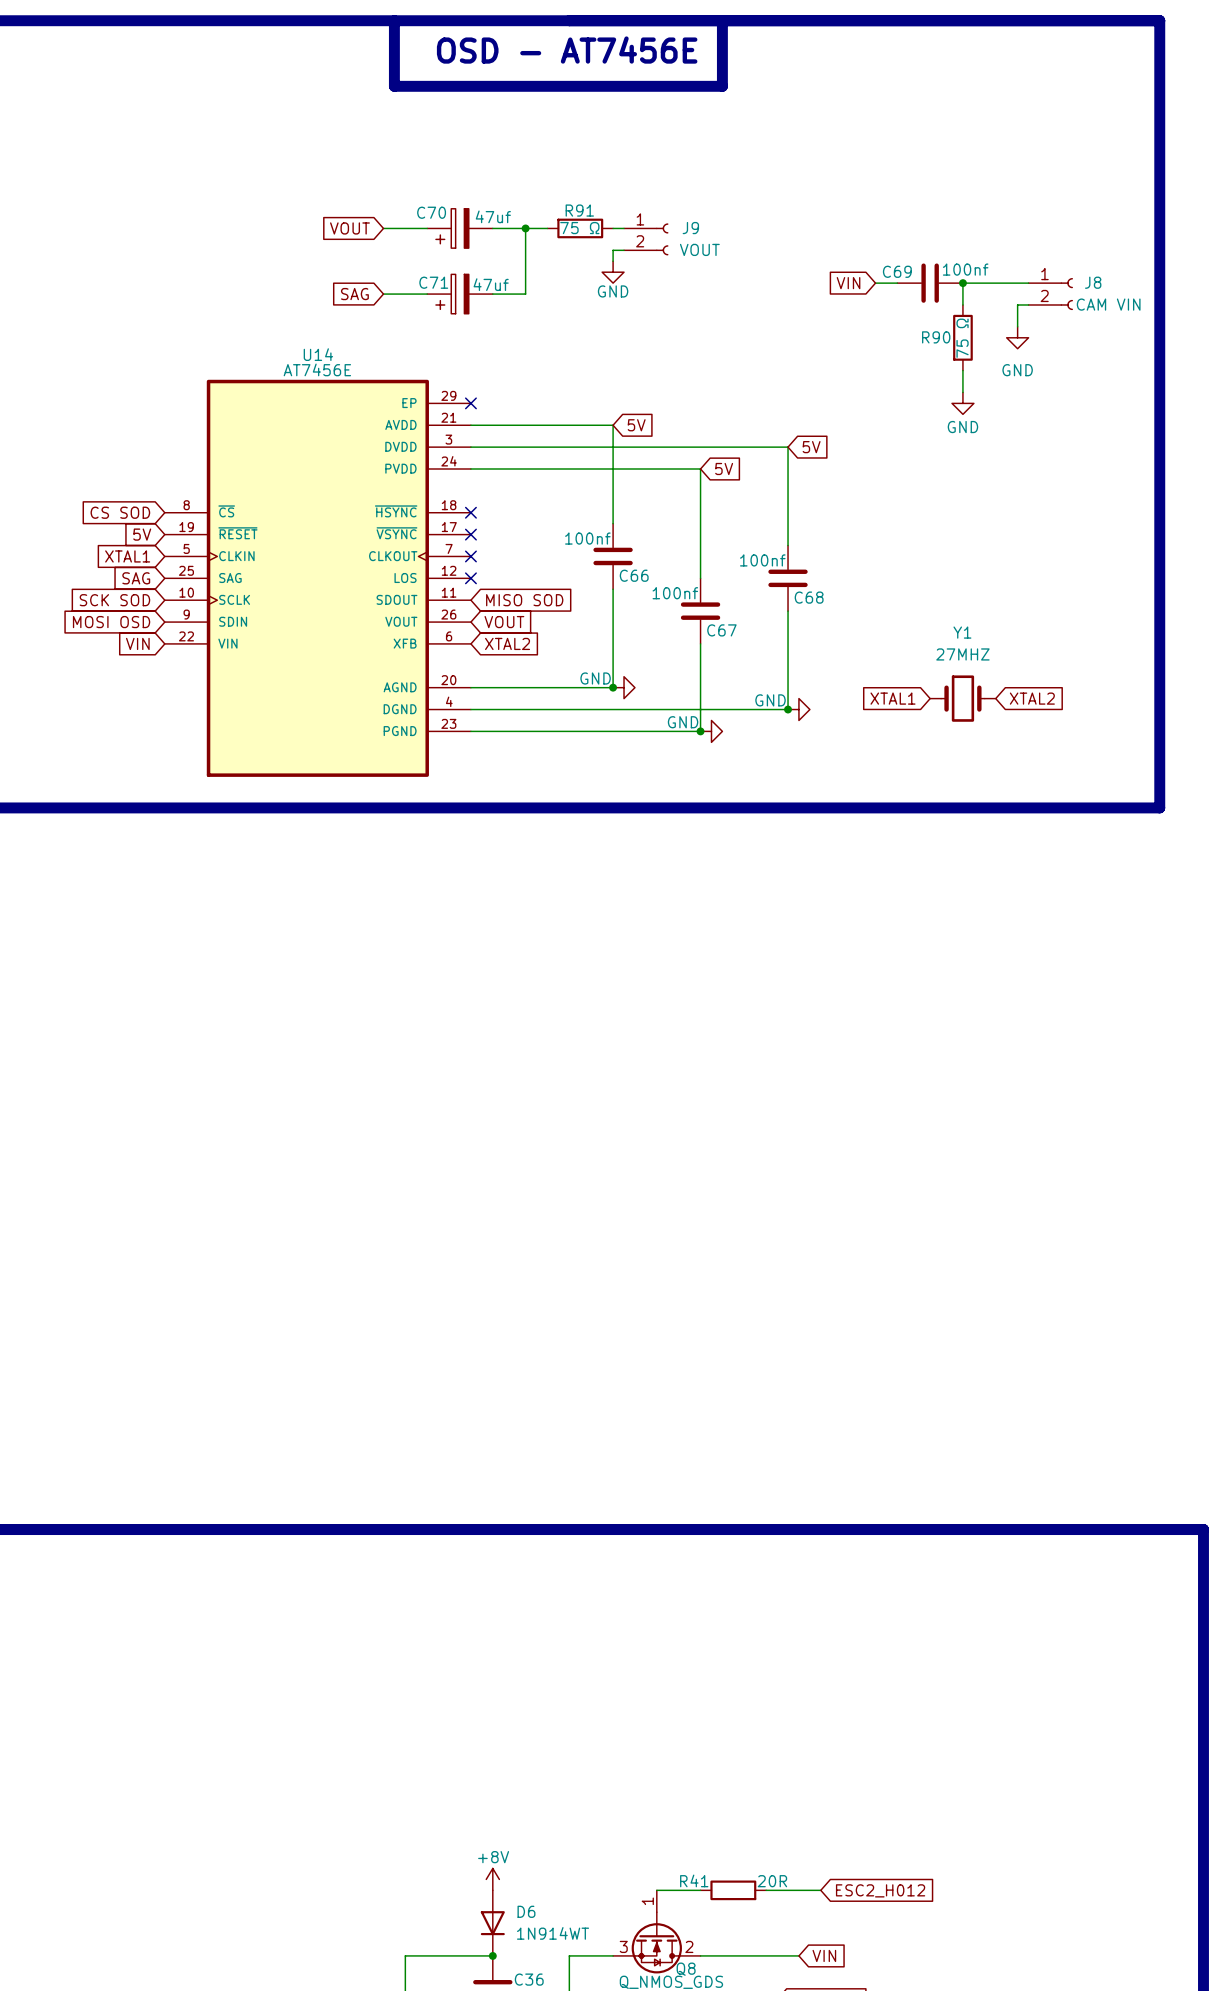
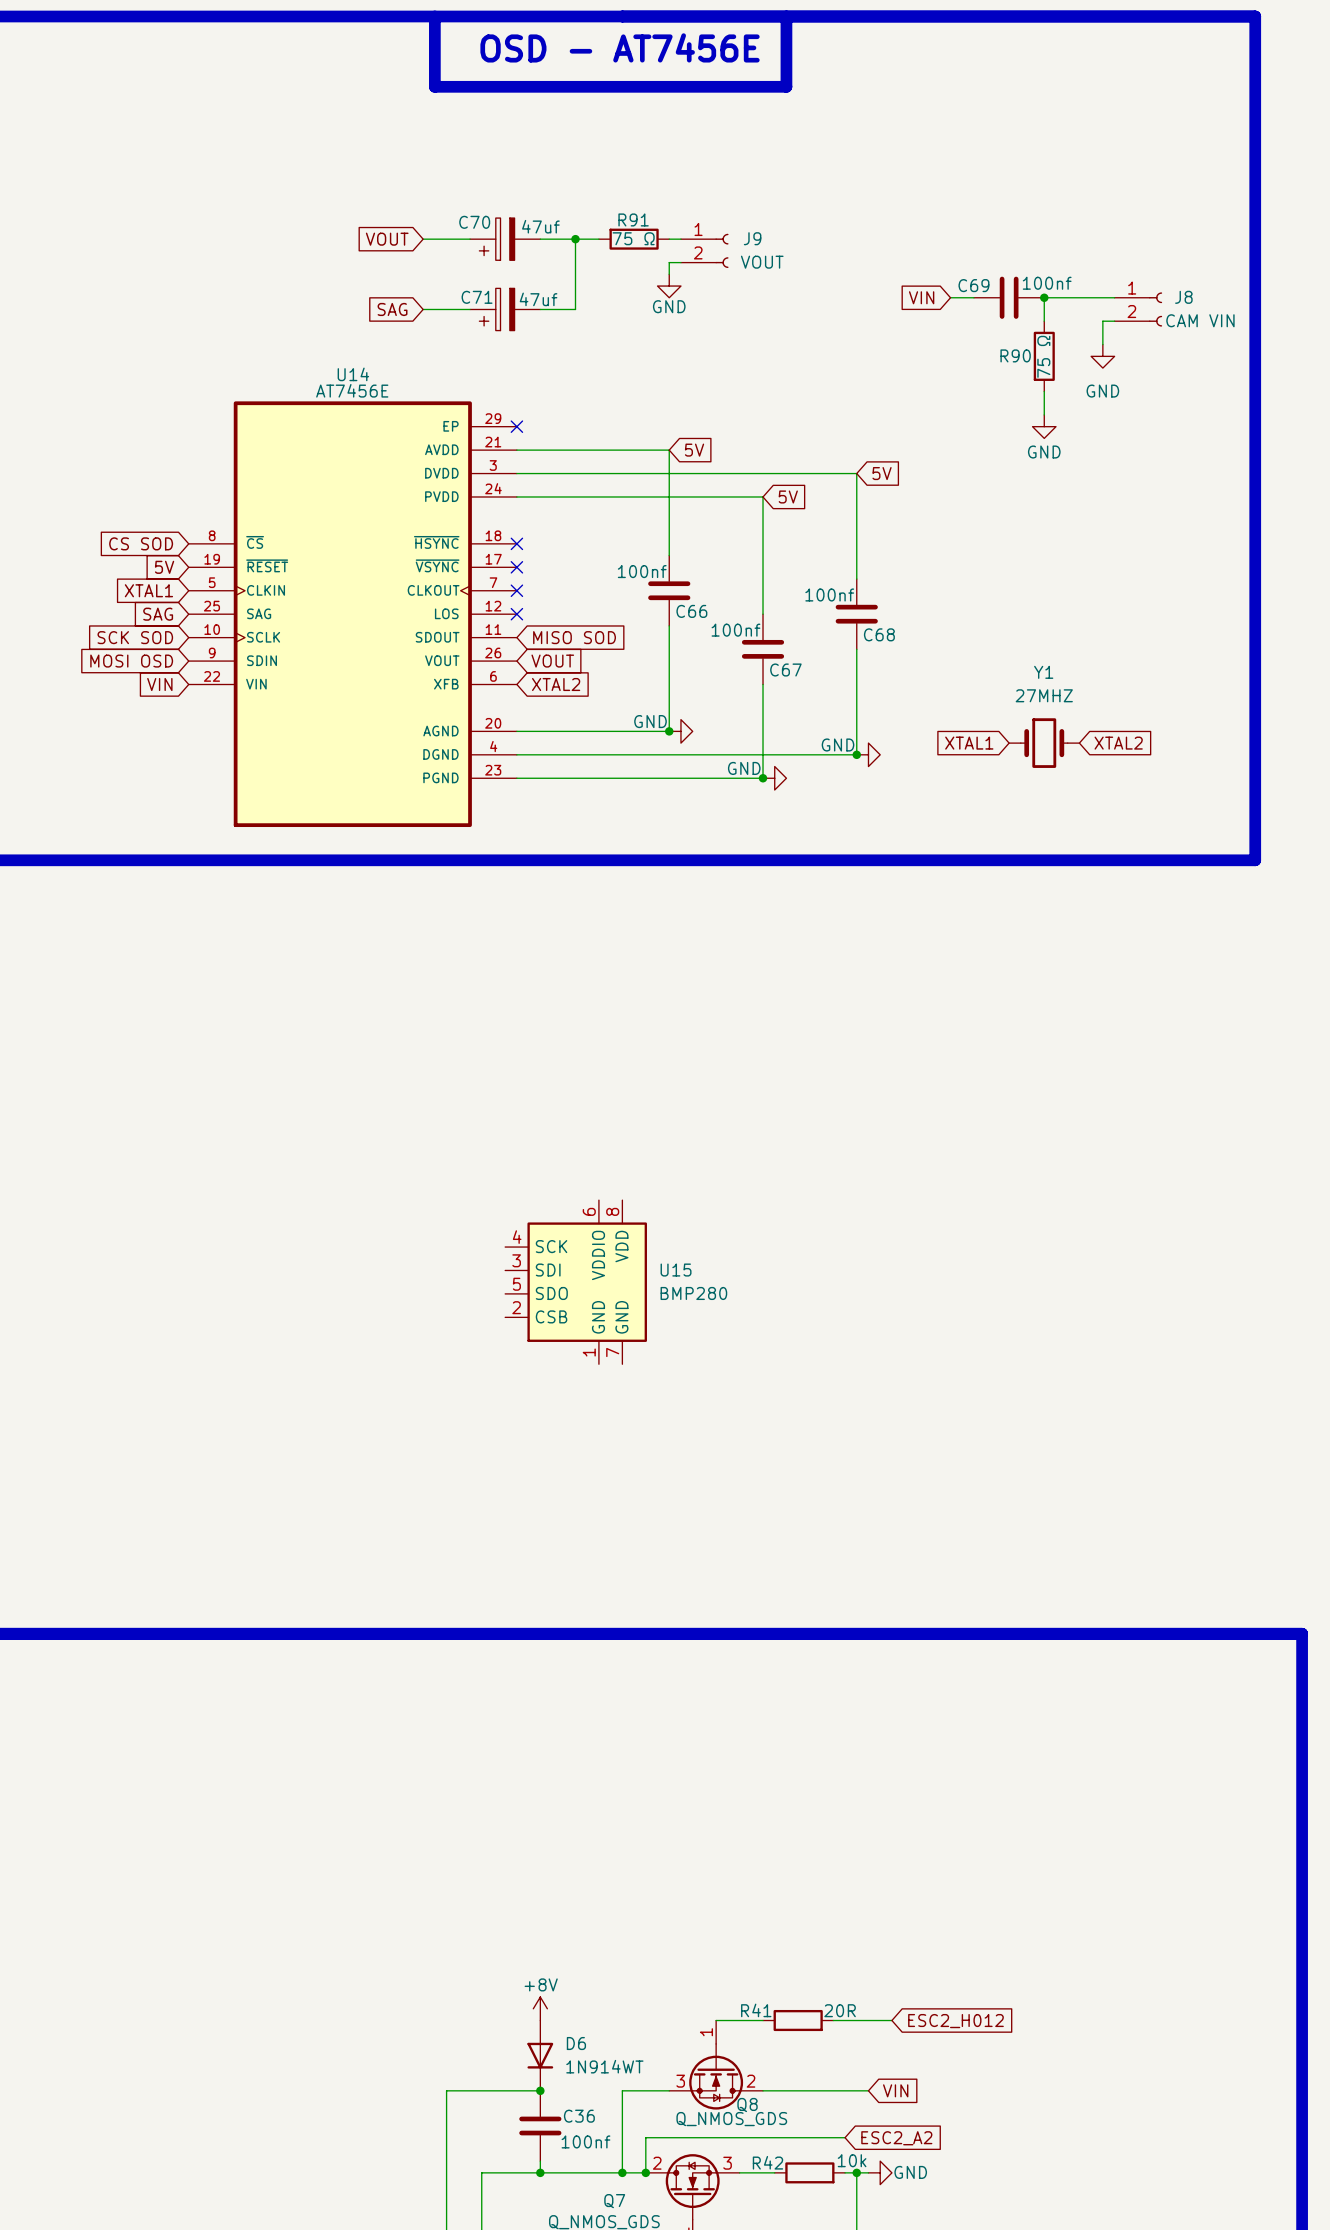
U15: none -> BMP280 (576, 1282)

